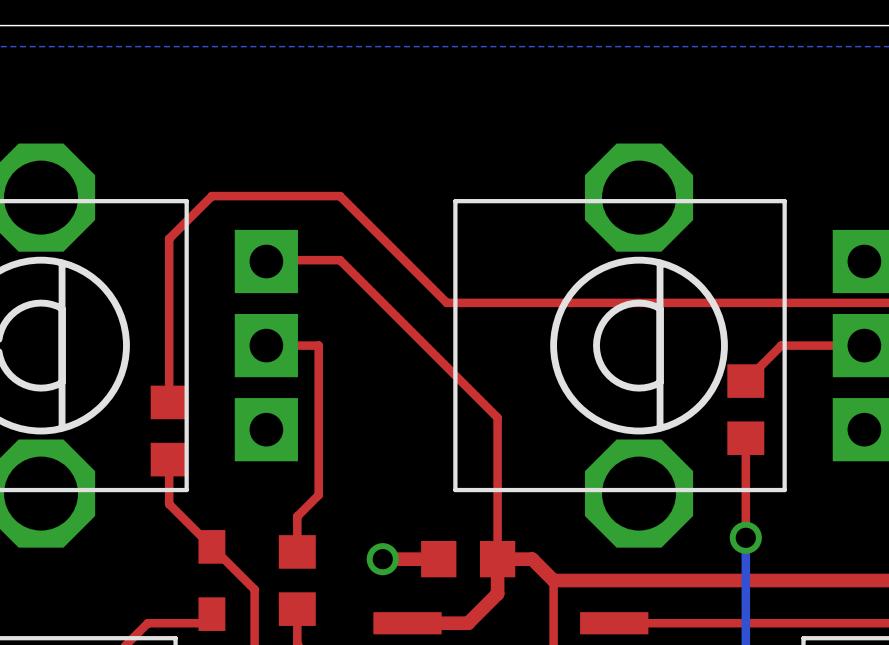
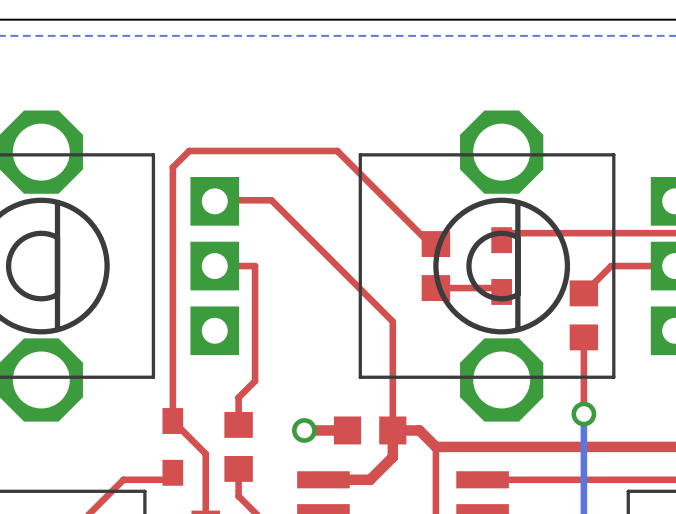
top track: (233, 196) (211, 196) (169, 238) (169, 402) -> (189, 150) (172, 167) (172, 421)
top track: (340, 196) (446, 302) (648, 302) -> (271, 150) (337, 150) (430, 244) (435, 244)
part: none -> (501, 266)
top track: none -> (435, 288) (497, 288) (501, 291)
part position: (169, 431) -> (435, 266)
top track: (169, 459) (169, 504) (211, 546) -> none

